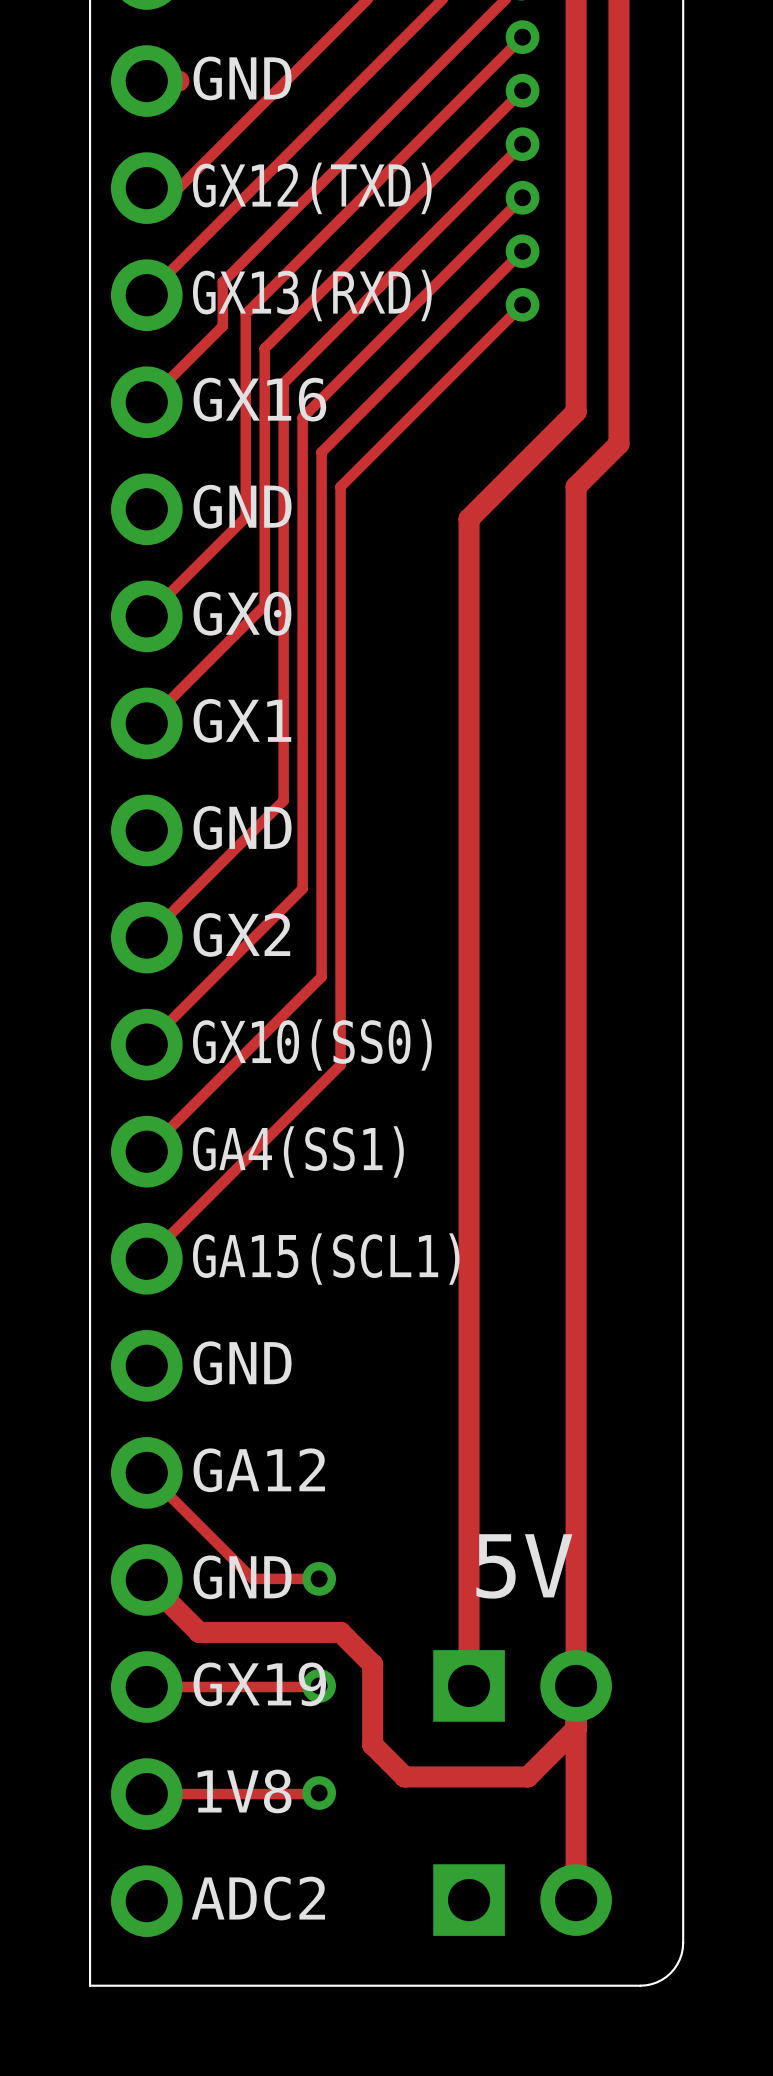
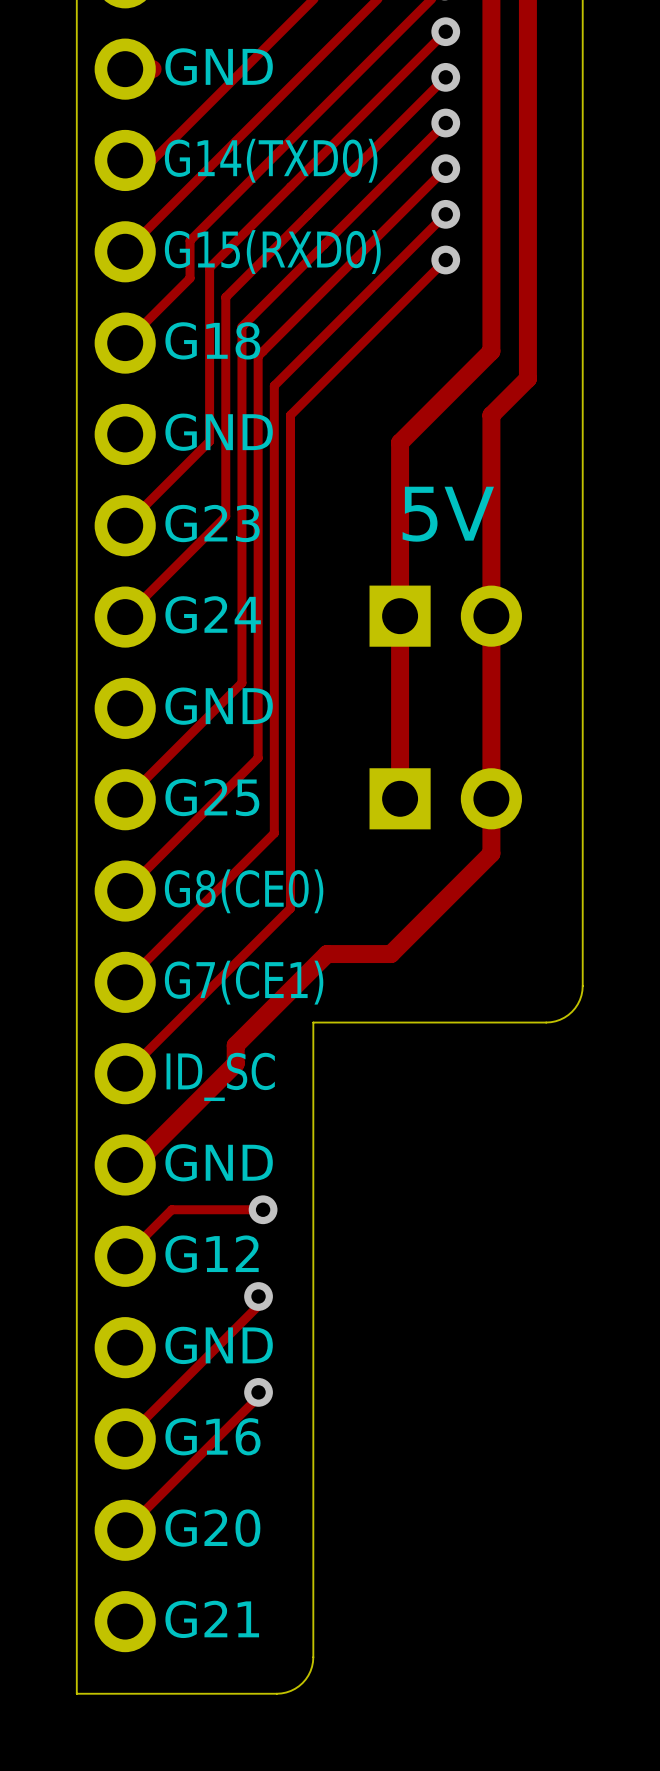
text: GX12(TXD) (312, 188) -> G14(TXD0) (271, 160)
text: GX13(RXD) (312, 295) -> G15(RXD0) (272, 252)
text: GX16 (259, 399) -> G18 (212, 340)
text: GX0 (242, 613) -> G23 (212, 523)
text: GX1 (242, 720) -> G24 (213, 614)
part: none -> (445, 616)
text: GX2 (241, 934) -> G25 (212, 797)
track: (469, 936) (469, 1685) -> none
part: none -> (445, 798)
track: (576, 1000) (576, 1900) -> (491, 853) (390, 954) (327, 954) (235, 1045) (235, 1063) (134, 1165) (125, 1165)
text: GX10(SS0) (312, 1044) -> G8(CE0) (244, 891)
text: GA4(SS1) (298, 1152) -> G7(CE1) (244, 982)
board edge: (683, 1155) (683, 1942) (679, 1959) (666, 1976) (645, 1985) (324, 1985) -> (582, 986) (579, 999) (572, 1011) (564, 1017) (550, 1022) (313, 1022) (313, 1657) (310, 1671) (302, 1683) (290, 1690) (276, 1693)
text: GA15(SCL1) (326, 1259) -> ID_SC (220, 1076)
via: none -> (263, 1209)
text: GA12 (259, 1470) -> G12 (212, 1254)
track: (146, 1472) (252, 1578) (319, 1578) -> (125, 1256) (171, 1209) (263, 1209)
via: none -> (258, 1296)
text position: 5V (524, 1566) -> 5V (448, 514)
via: (319, 1578) -> none
track: (146, 1579) (199, 1632) (340, 1632) (372, 1664) (372, 1744) (404, 1776) (527, 1776) (576, 1728) -> none
via: none -> (258, 1392)
text: GX19 (259, 1684) -> G16 (212, 1436)
track: (319, 1685) (146, 1687) -> (258, 1296) (258, 1305) (125, 1438)
via: (319, 1685) -> none
part: (522, 1685) -> none
text: 1V8 (244, 1791) -> G20 (212, 1528)
track: (319, 1793) (146, 1794) -> (258, 1392) (258, 1396) (125, 1530)
via: (319, 1793) -> none
text: ADC2 (258, 1898) -> G21 (212, 1619)
part: (522, 1900) -> none

